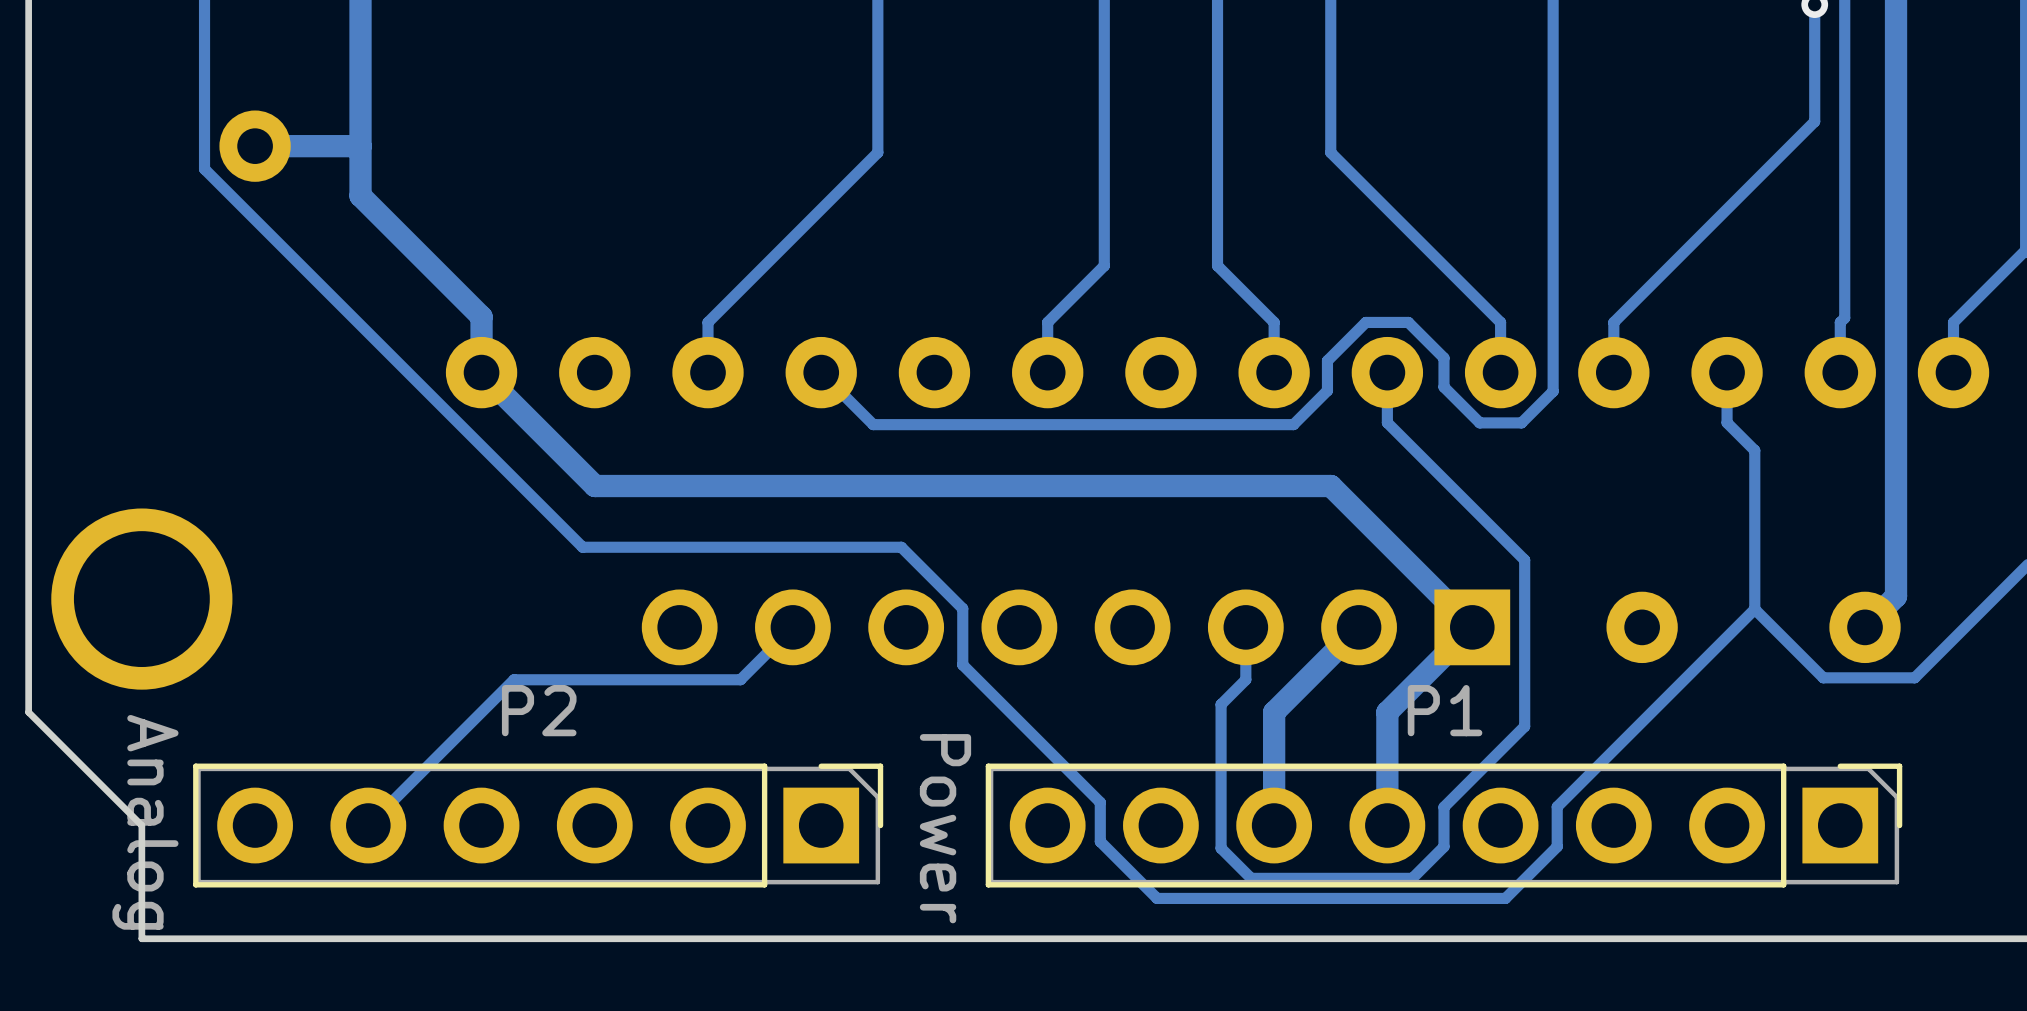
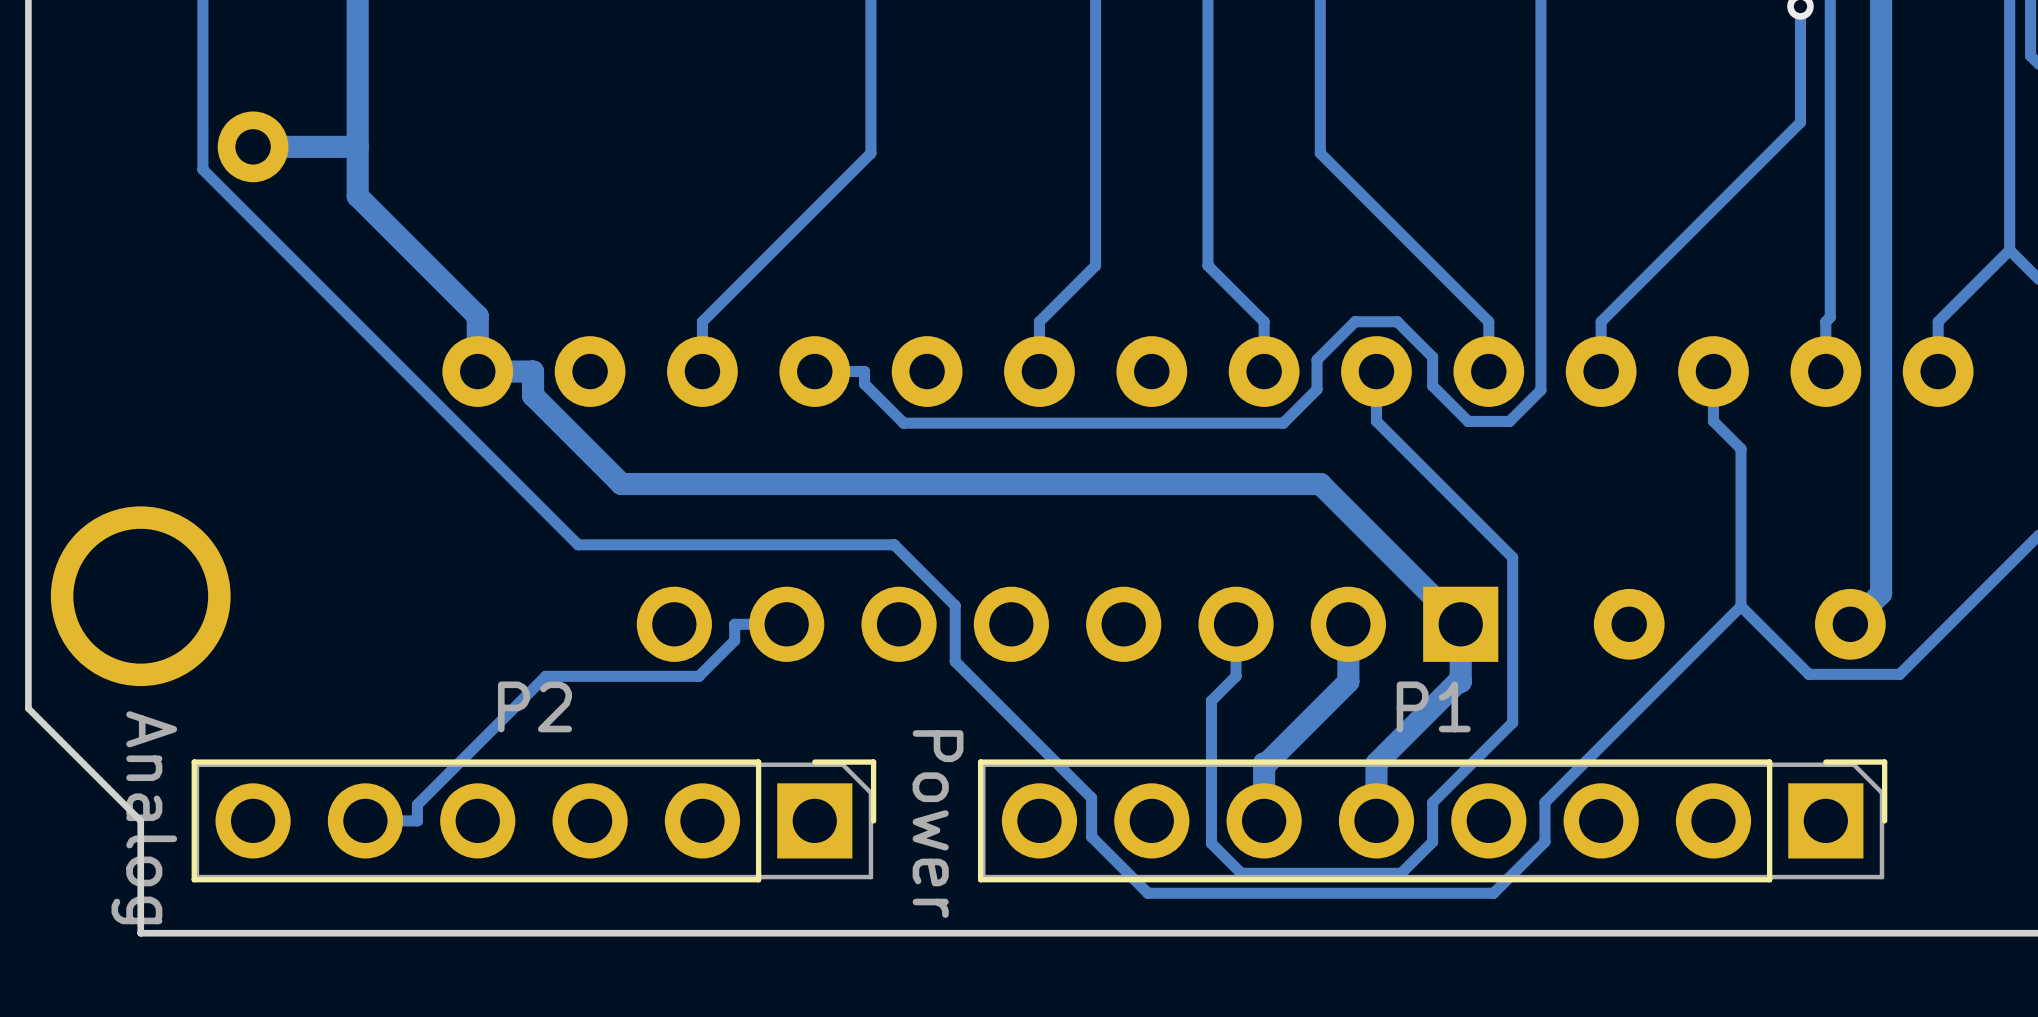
track: (481, 372) (594, 486) (626, 486) -> (477, 371) (533, 371) (533, 395) (621, 484)
track: (821, 372) (873, 424) (910, 424) -> (814, 371) (864, 371) (864, 383) (903, 423)
track: (792, 627) (740, 679) (704, 679) -> (786, 624) (734, 624) (734, 640) (698, 676)
track: (1359, 627) (1274, 712) (1274, 767) -> (1348, 624) (1348, 681) (1266, 763) (1264, 763)
track: (1472, 627) (1387, 712) (1387, 767) -> (1460, 624) (1460, 681) (1458, 681) (1376, 763)
track: (550, 679) (514, 679) (368, 825) -> (545, 676) (417, 804) (417, 820) (365, 820)

